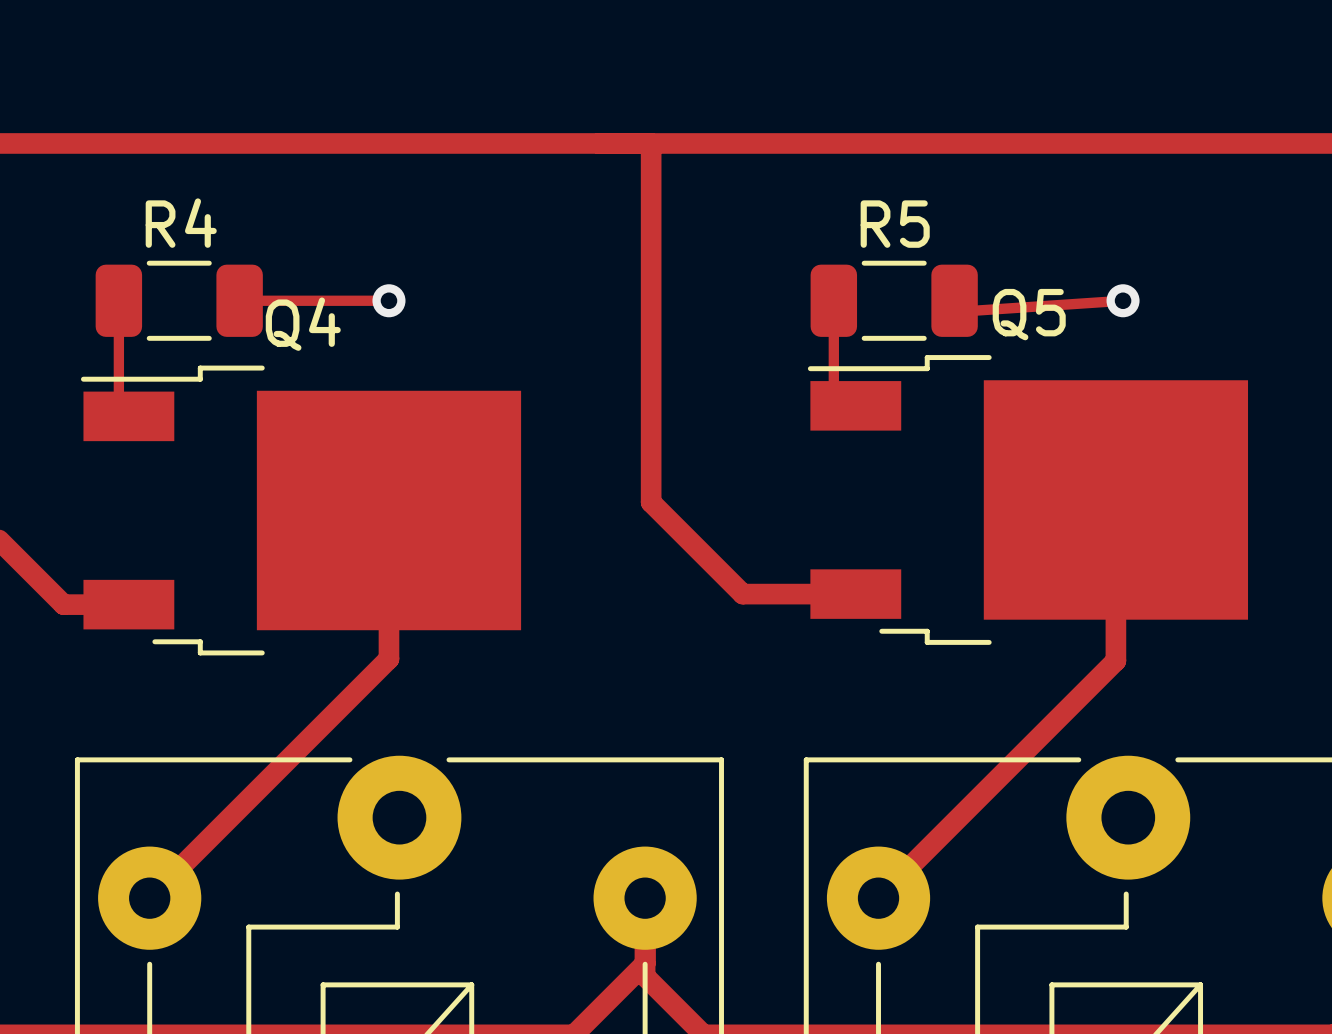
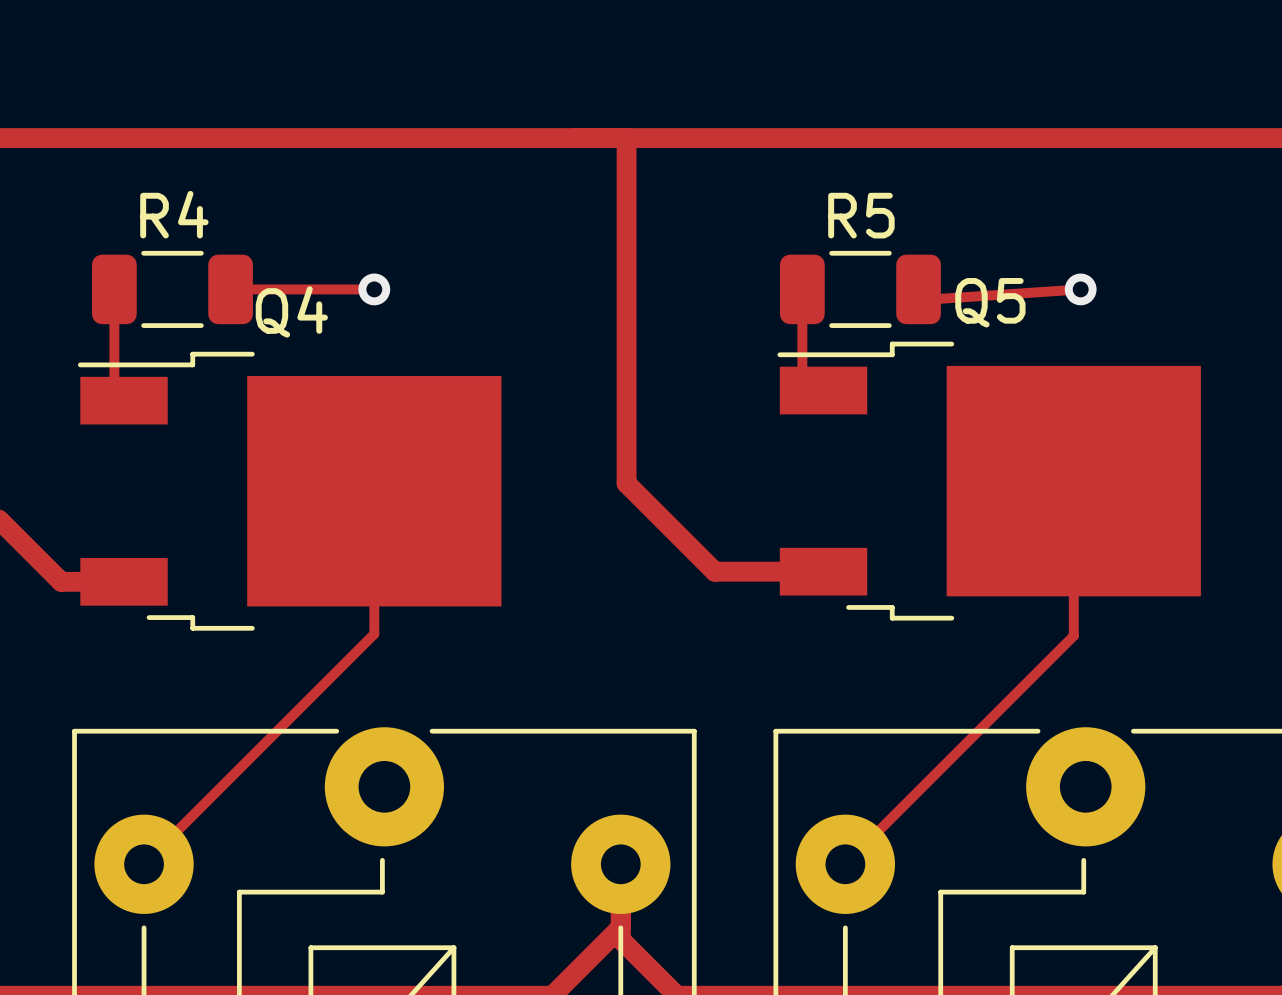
track width: thick (1115, 499) (1115, 660) (878, 898) -> thin (1073, 481) (1073, 635) (845, 864)
track width: thick (388, 510) (388, 658) (149, 898) -> thin (374, 491) (374, 634) (144, 864)

